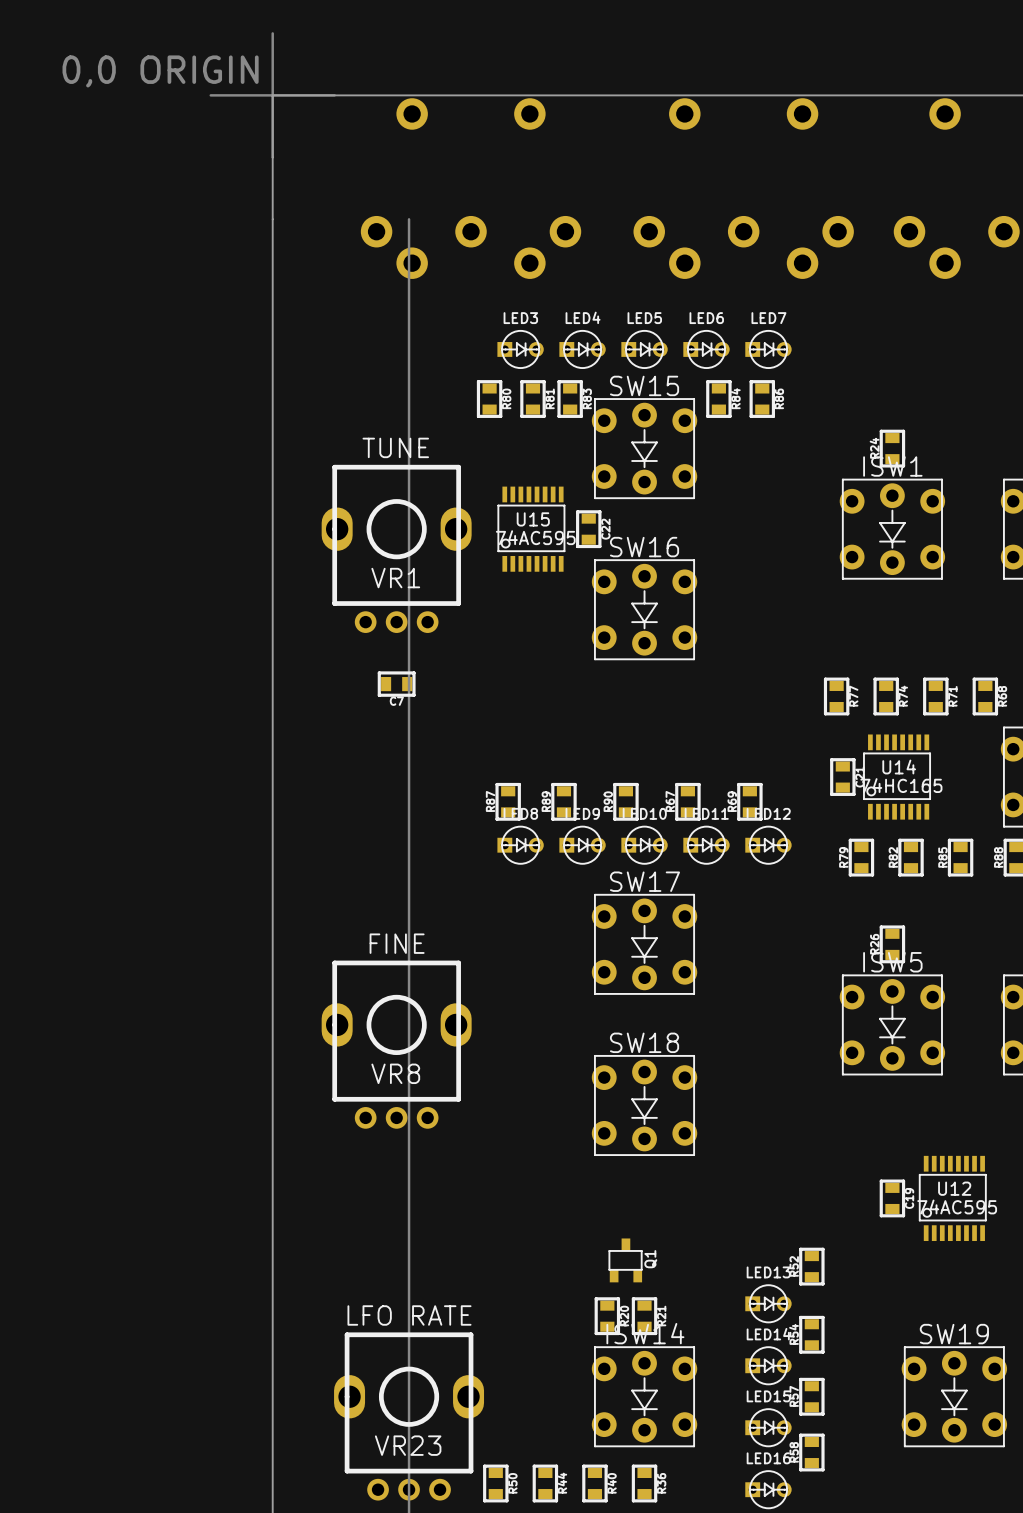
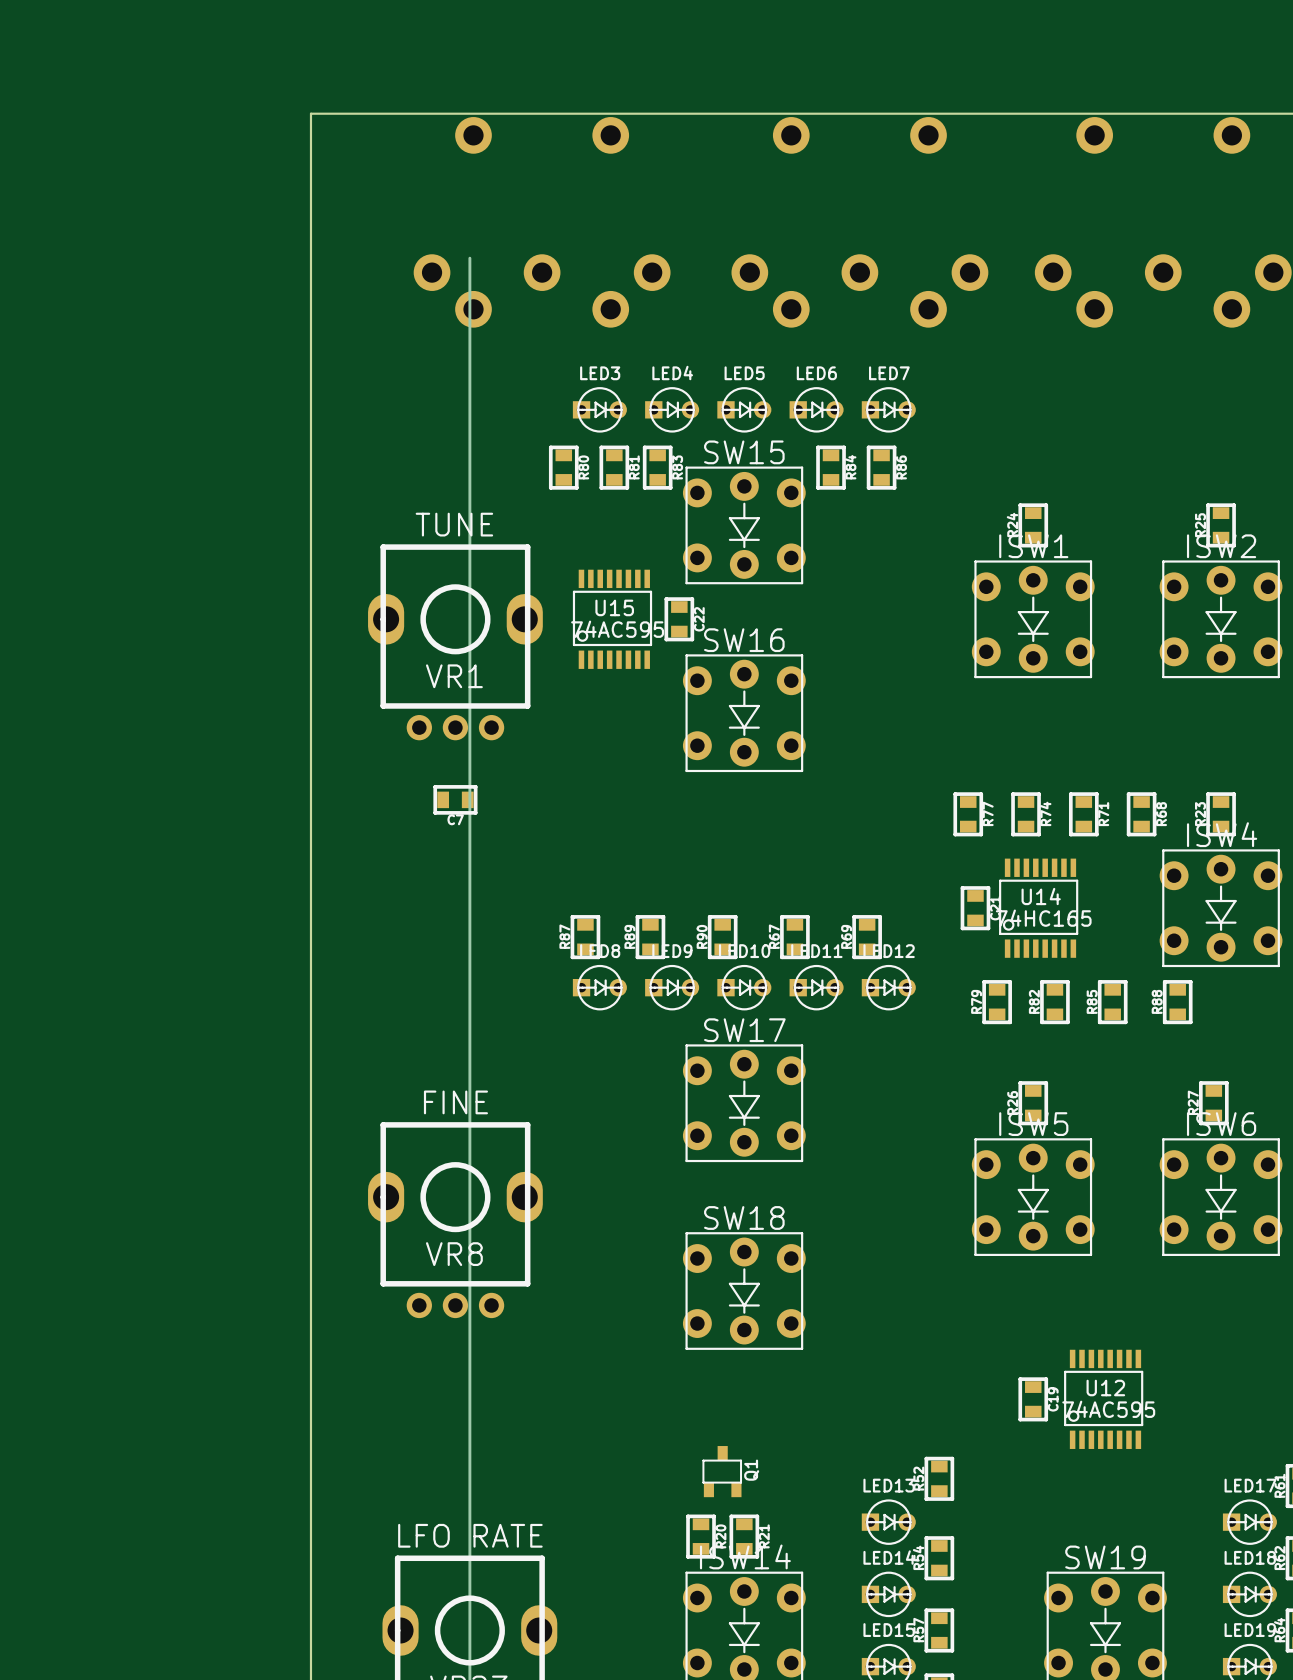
line: (272, 33) (272, 157) -> none
text: 0,0 ORIGIN (160, 71) -> none
line: (210, 95) (334, 95) -> none

